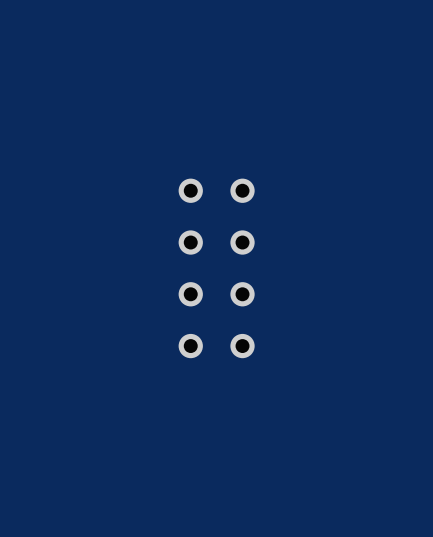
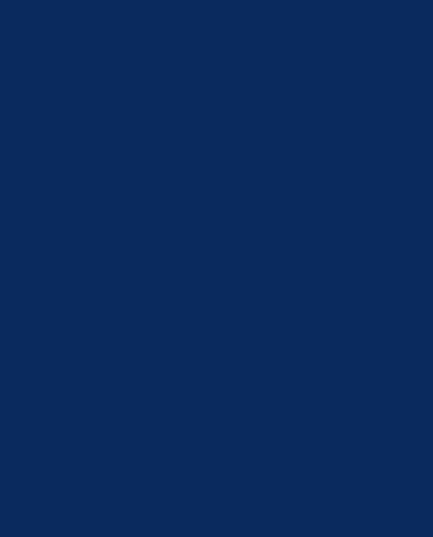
part: (216, 268) -> none

